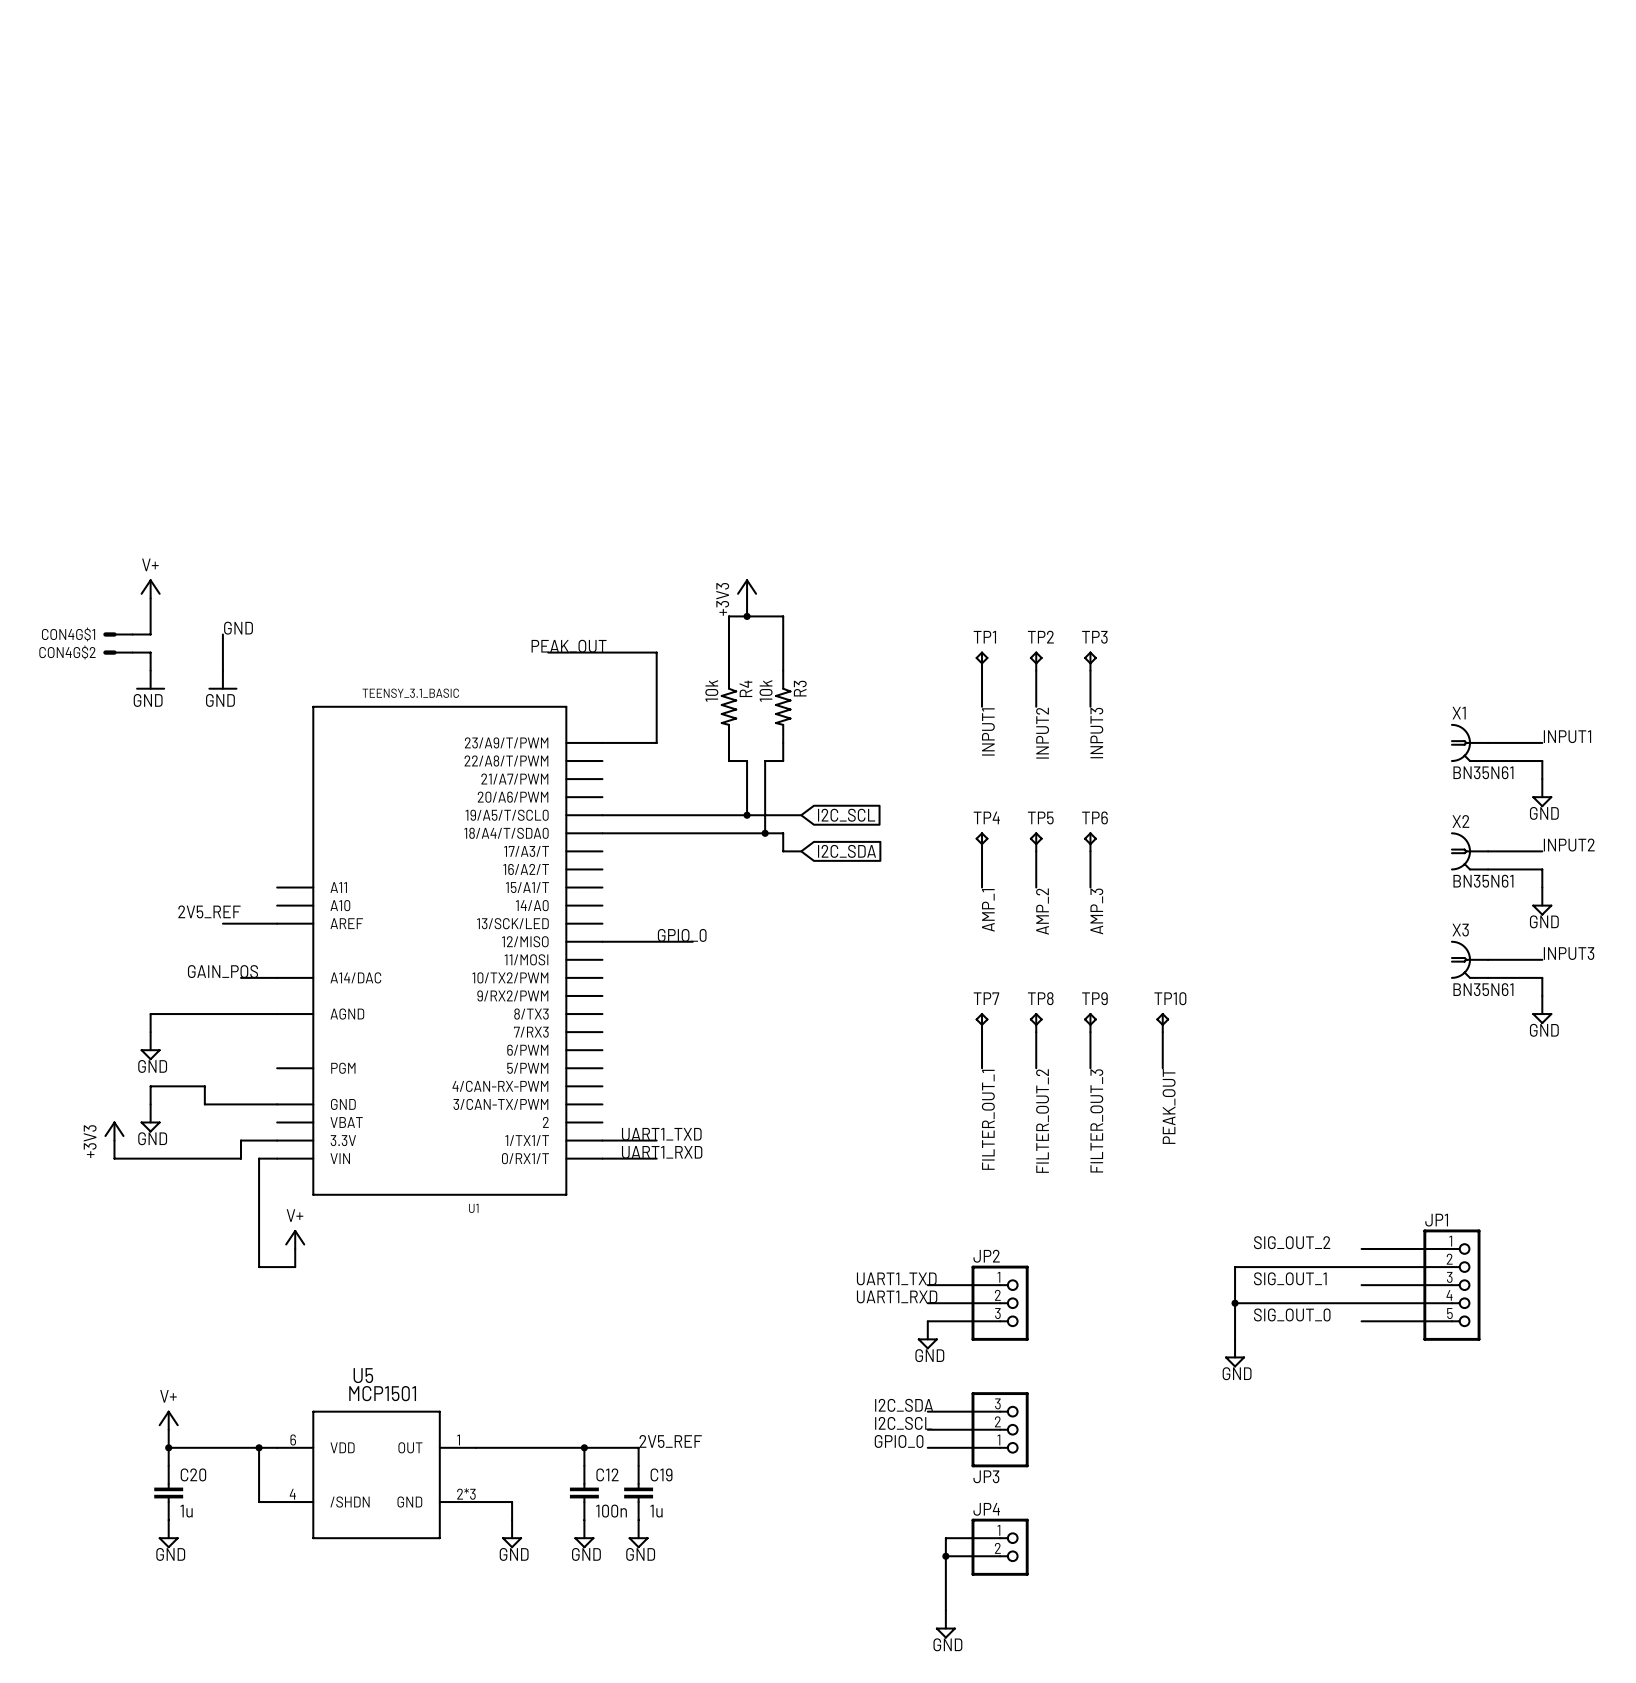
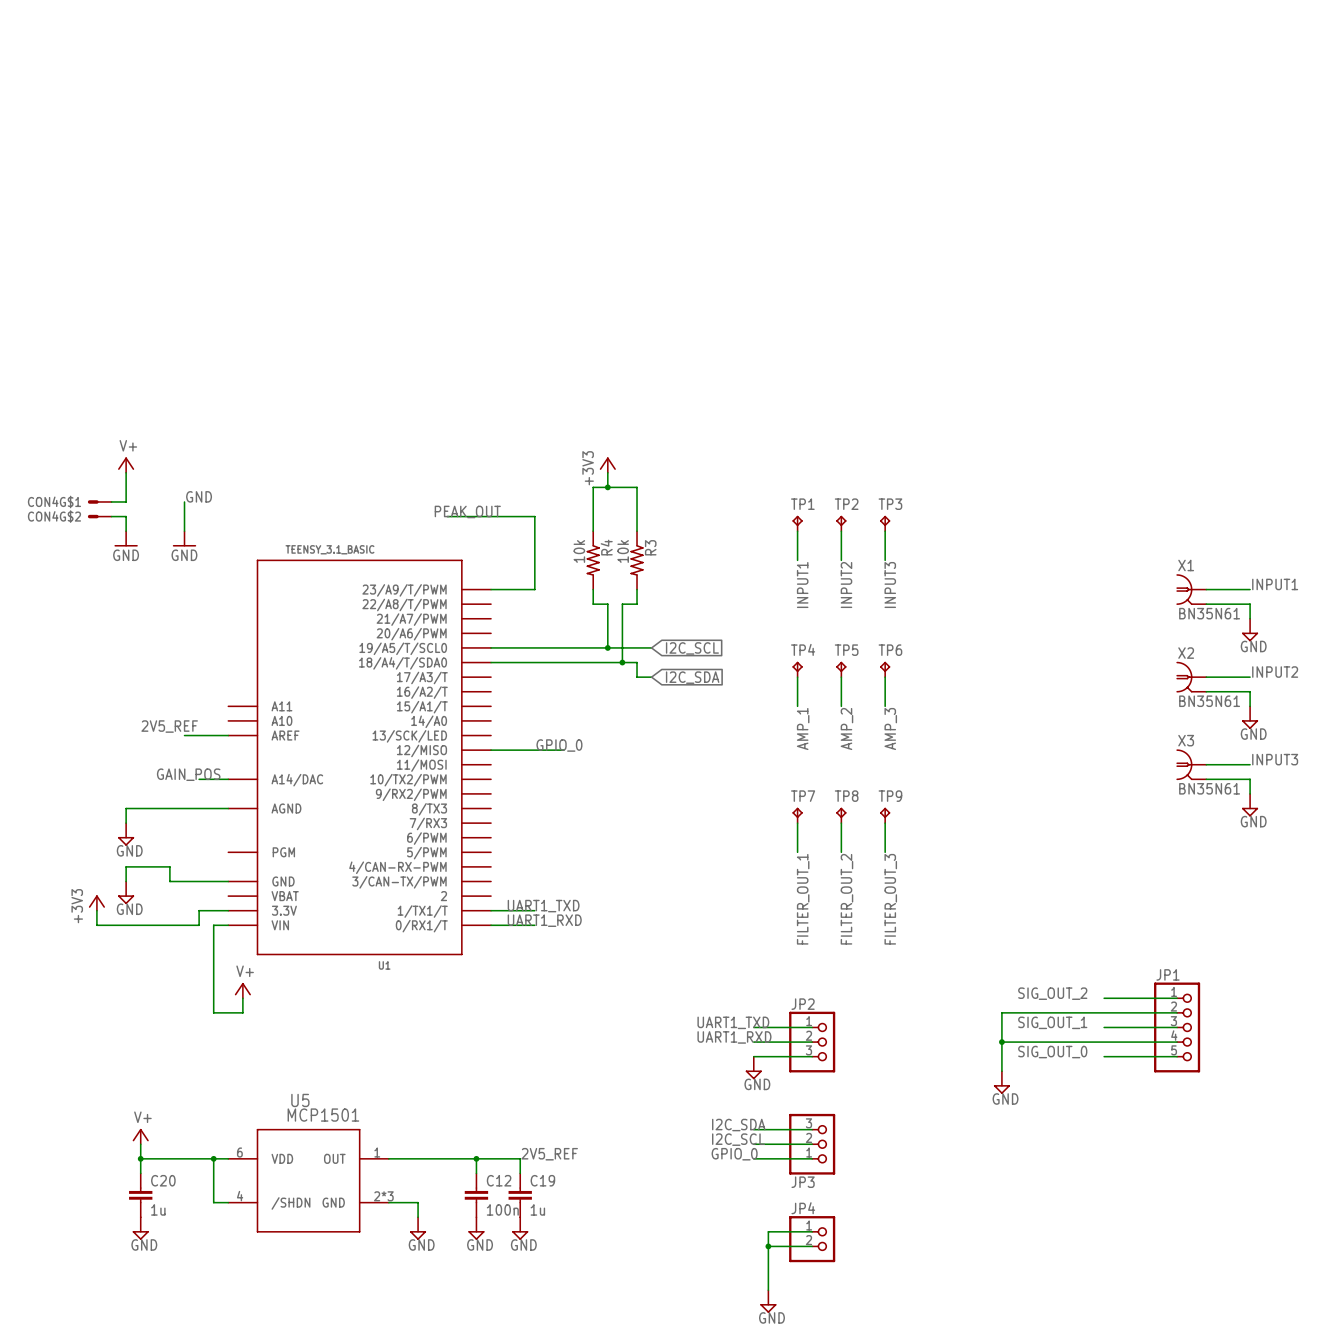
TP10: (1162, 1022) -> none
wire: (1162, 1032) (1162, 1068) -> none
label: PEAK_OUT (1169, 1106) -> none

